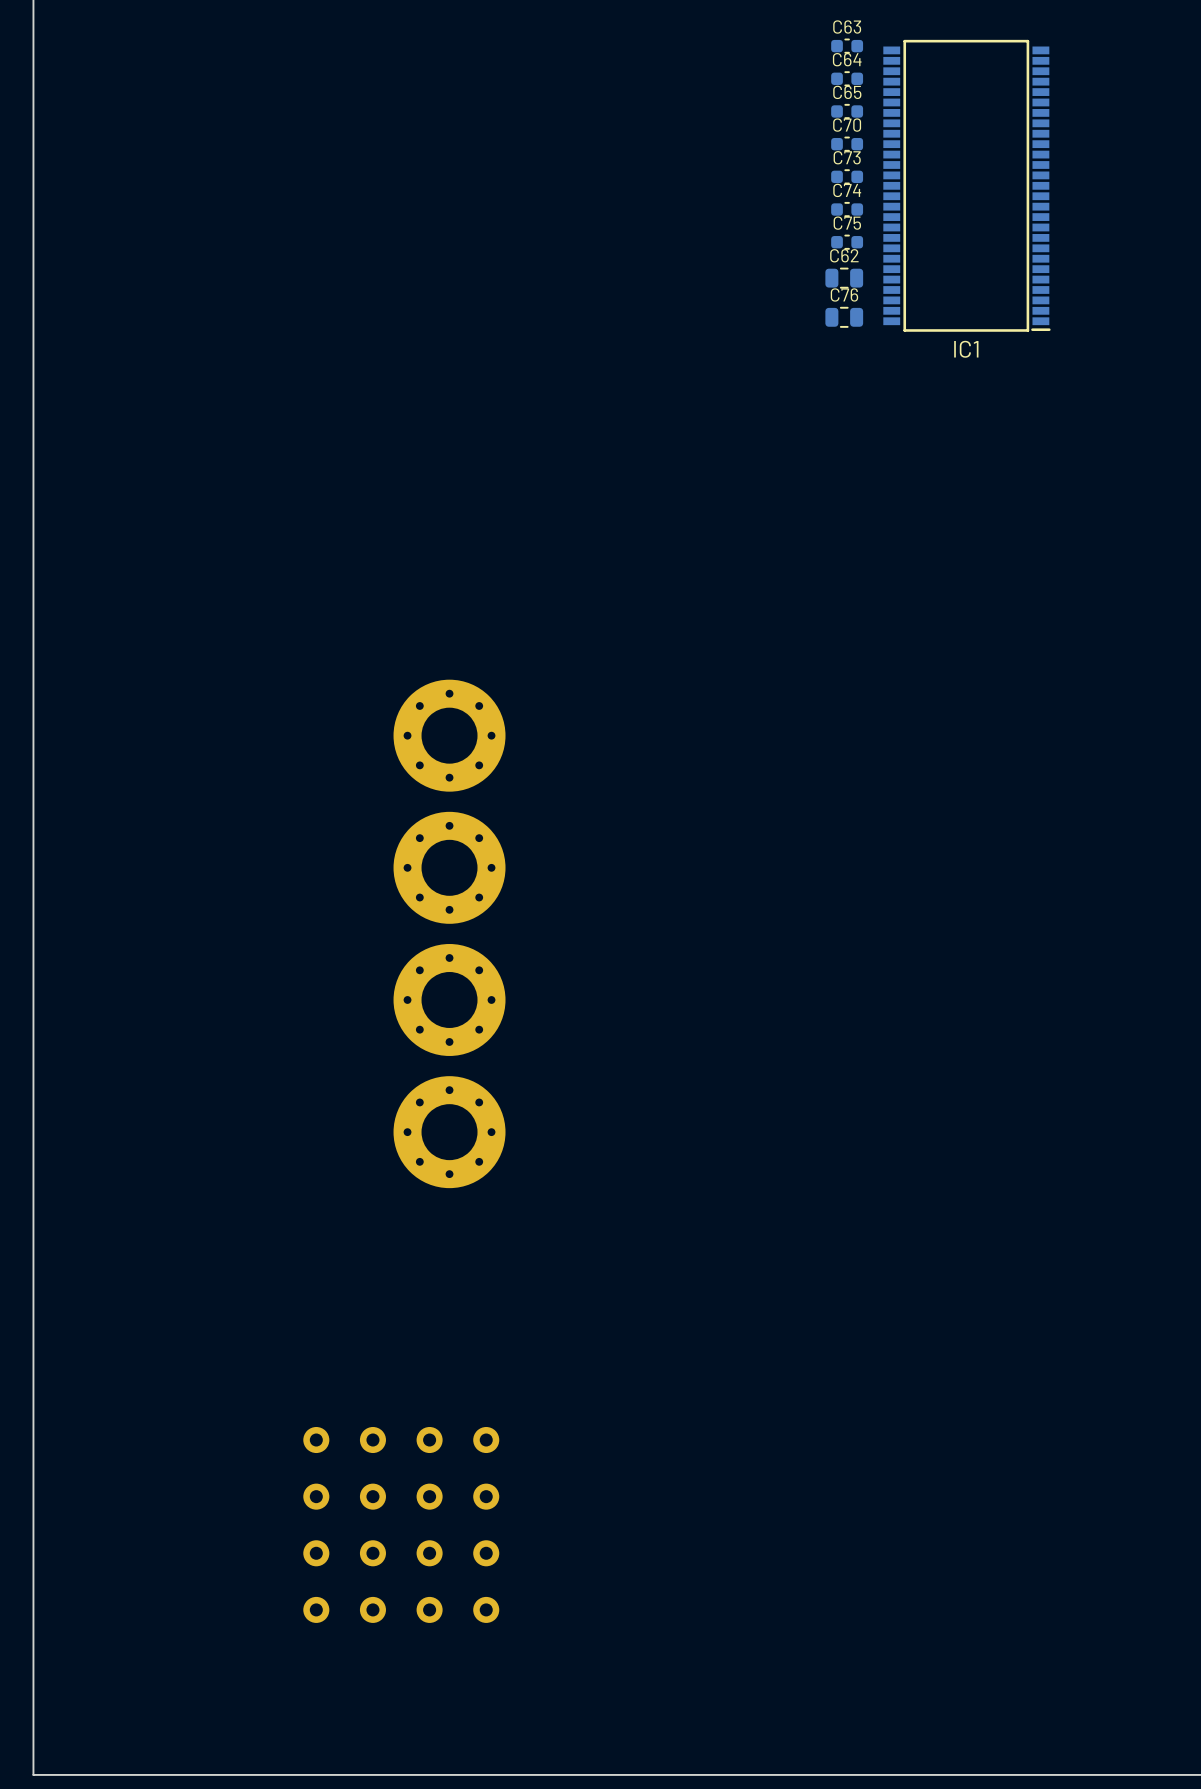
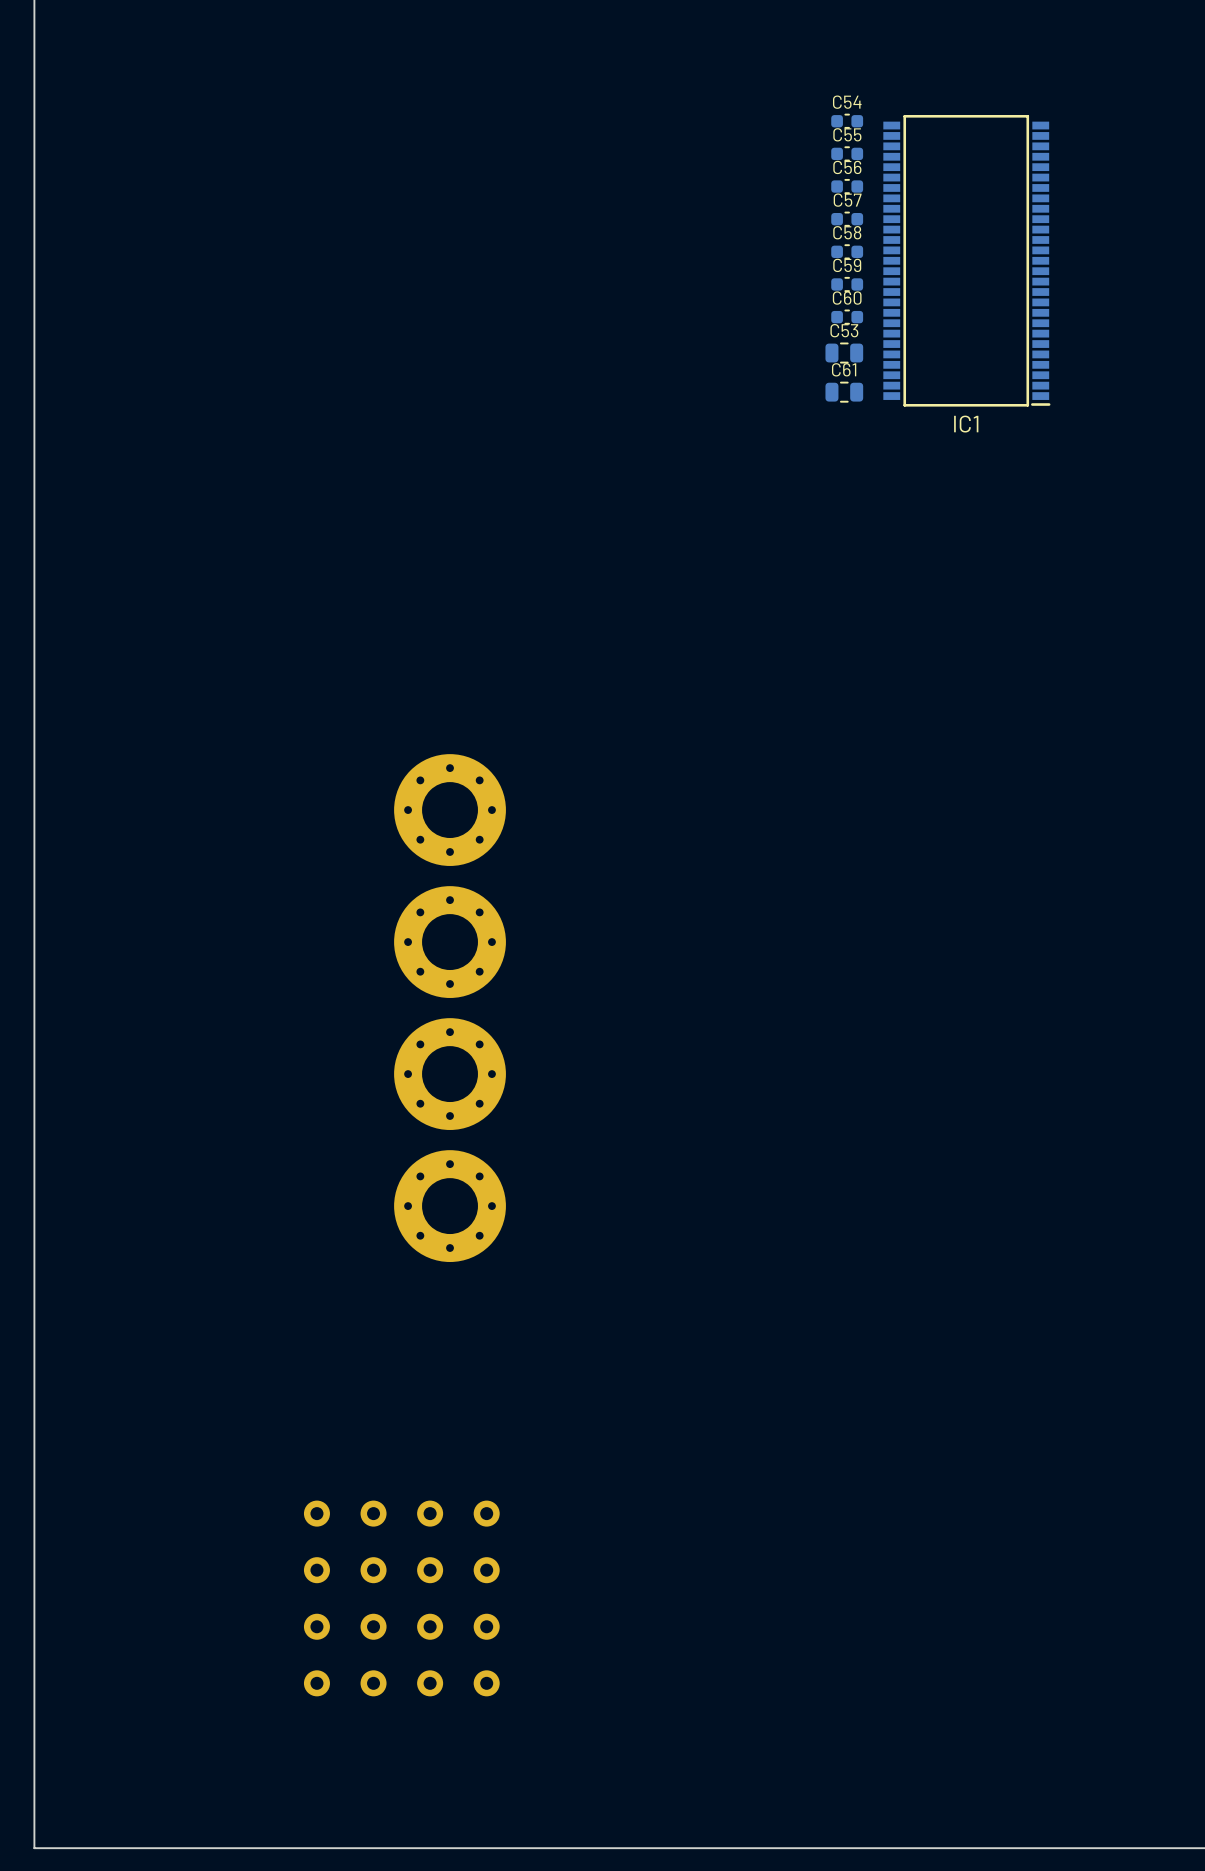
C63 name: C63 (847, 27) -> C54 (847, 102)
C64 name: C64 (847, 59) -> C55 (847, 134)
C65 name: C65 (847, 92) -> C56 (847, 167)
C70 name: C70 (847, 125) -> C57 (847, 200)
C73 name: C73 (847, 157) -> C58 (847, 232)
C74 name: C74 (847, 190) -> C59 (847, 265)
C75 name: C75 (847, 223) -> C60 (847, 298)
C62 name: C62 (844, 255) -> C53 (844, 330)
C76 name: C76 (844, 294) -> C61 (844, 369)

